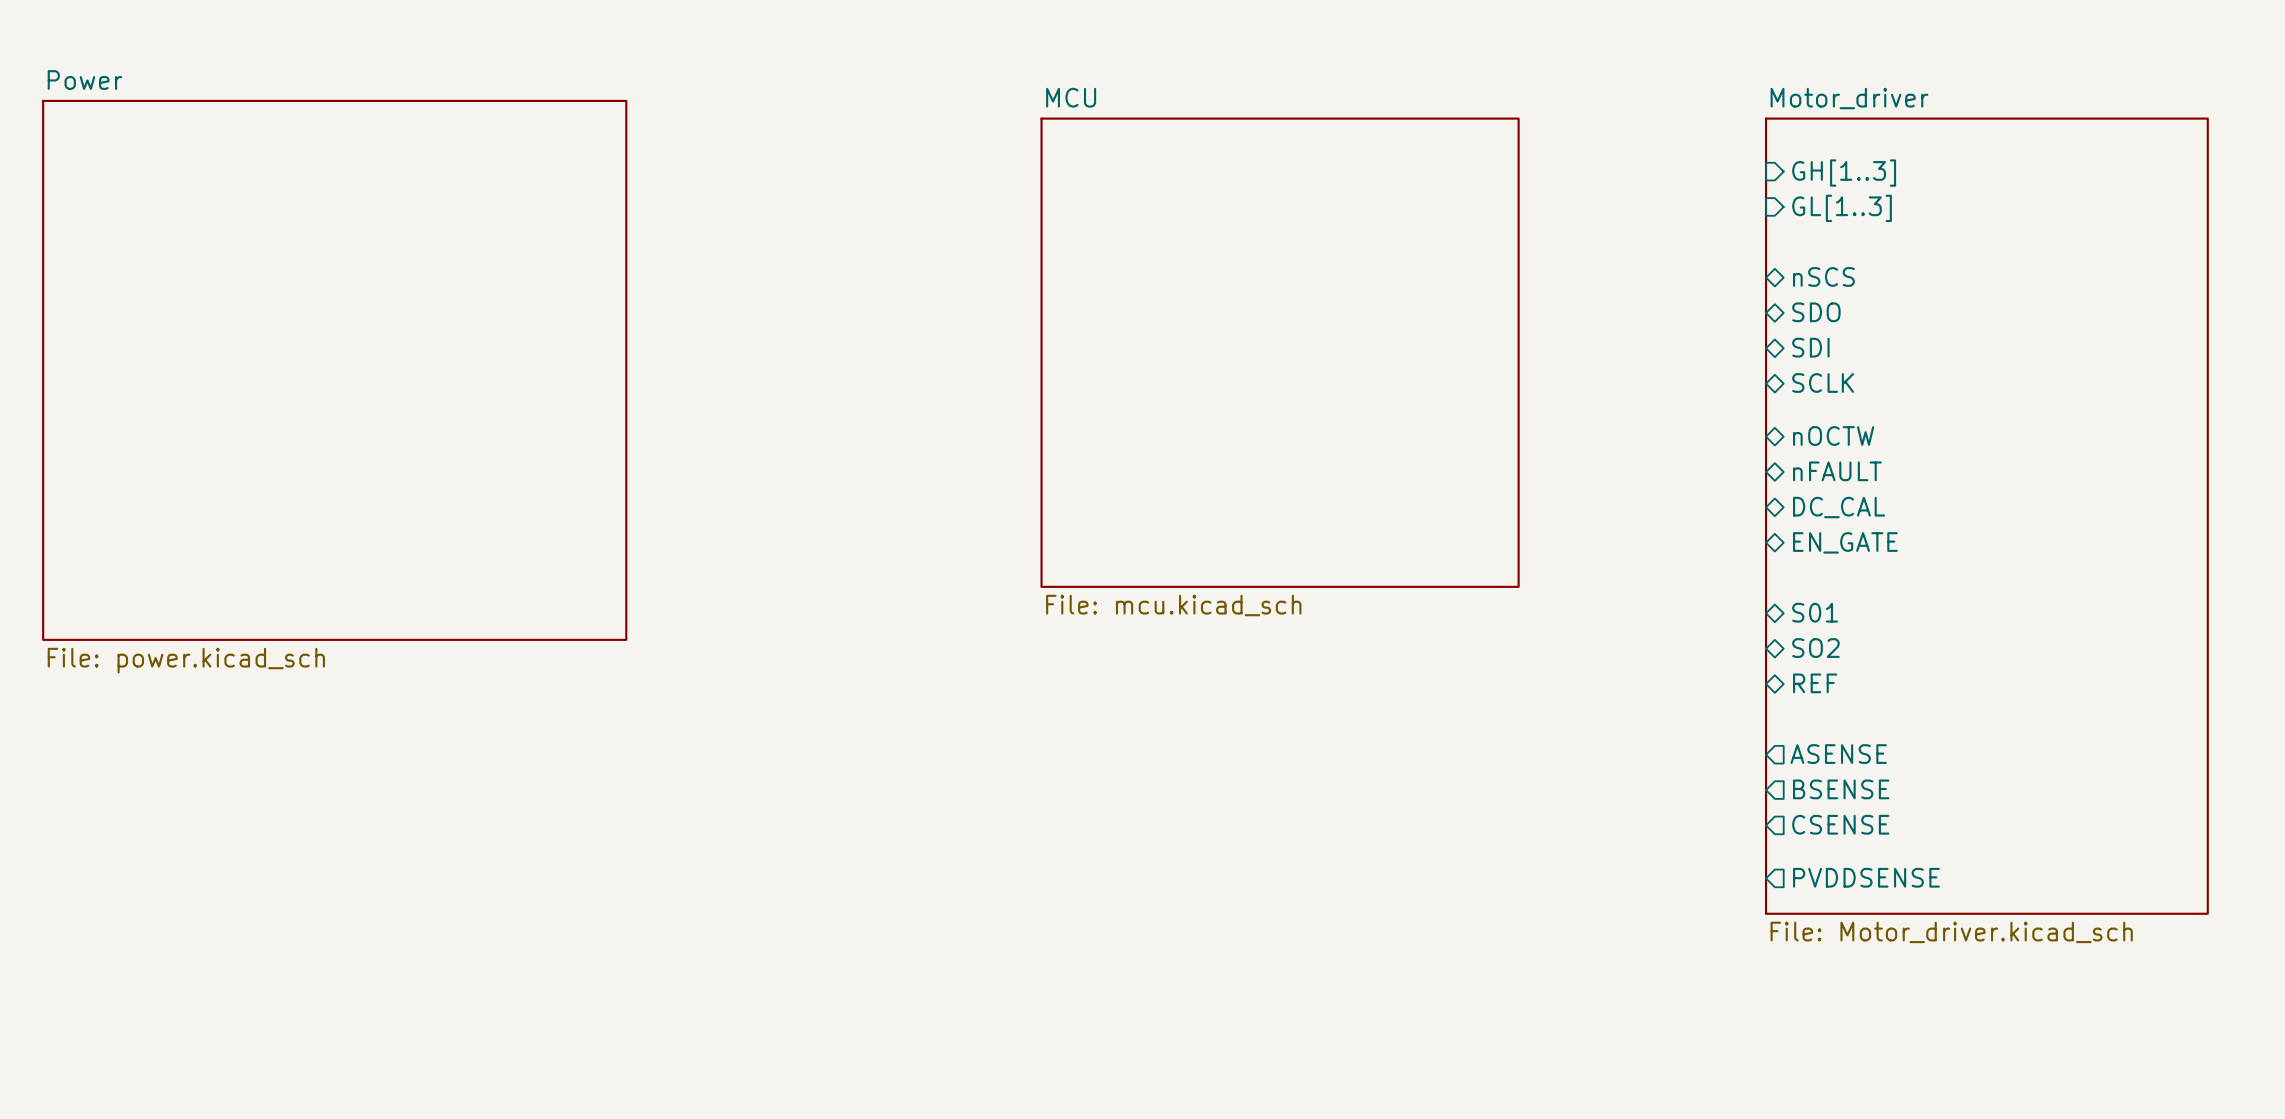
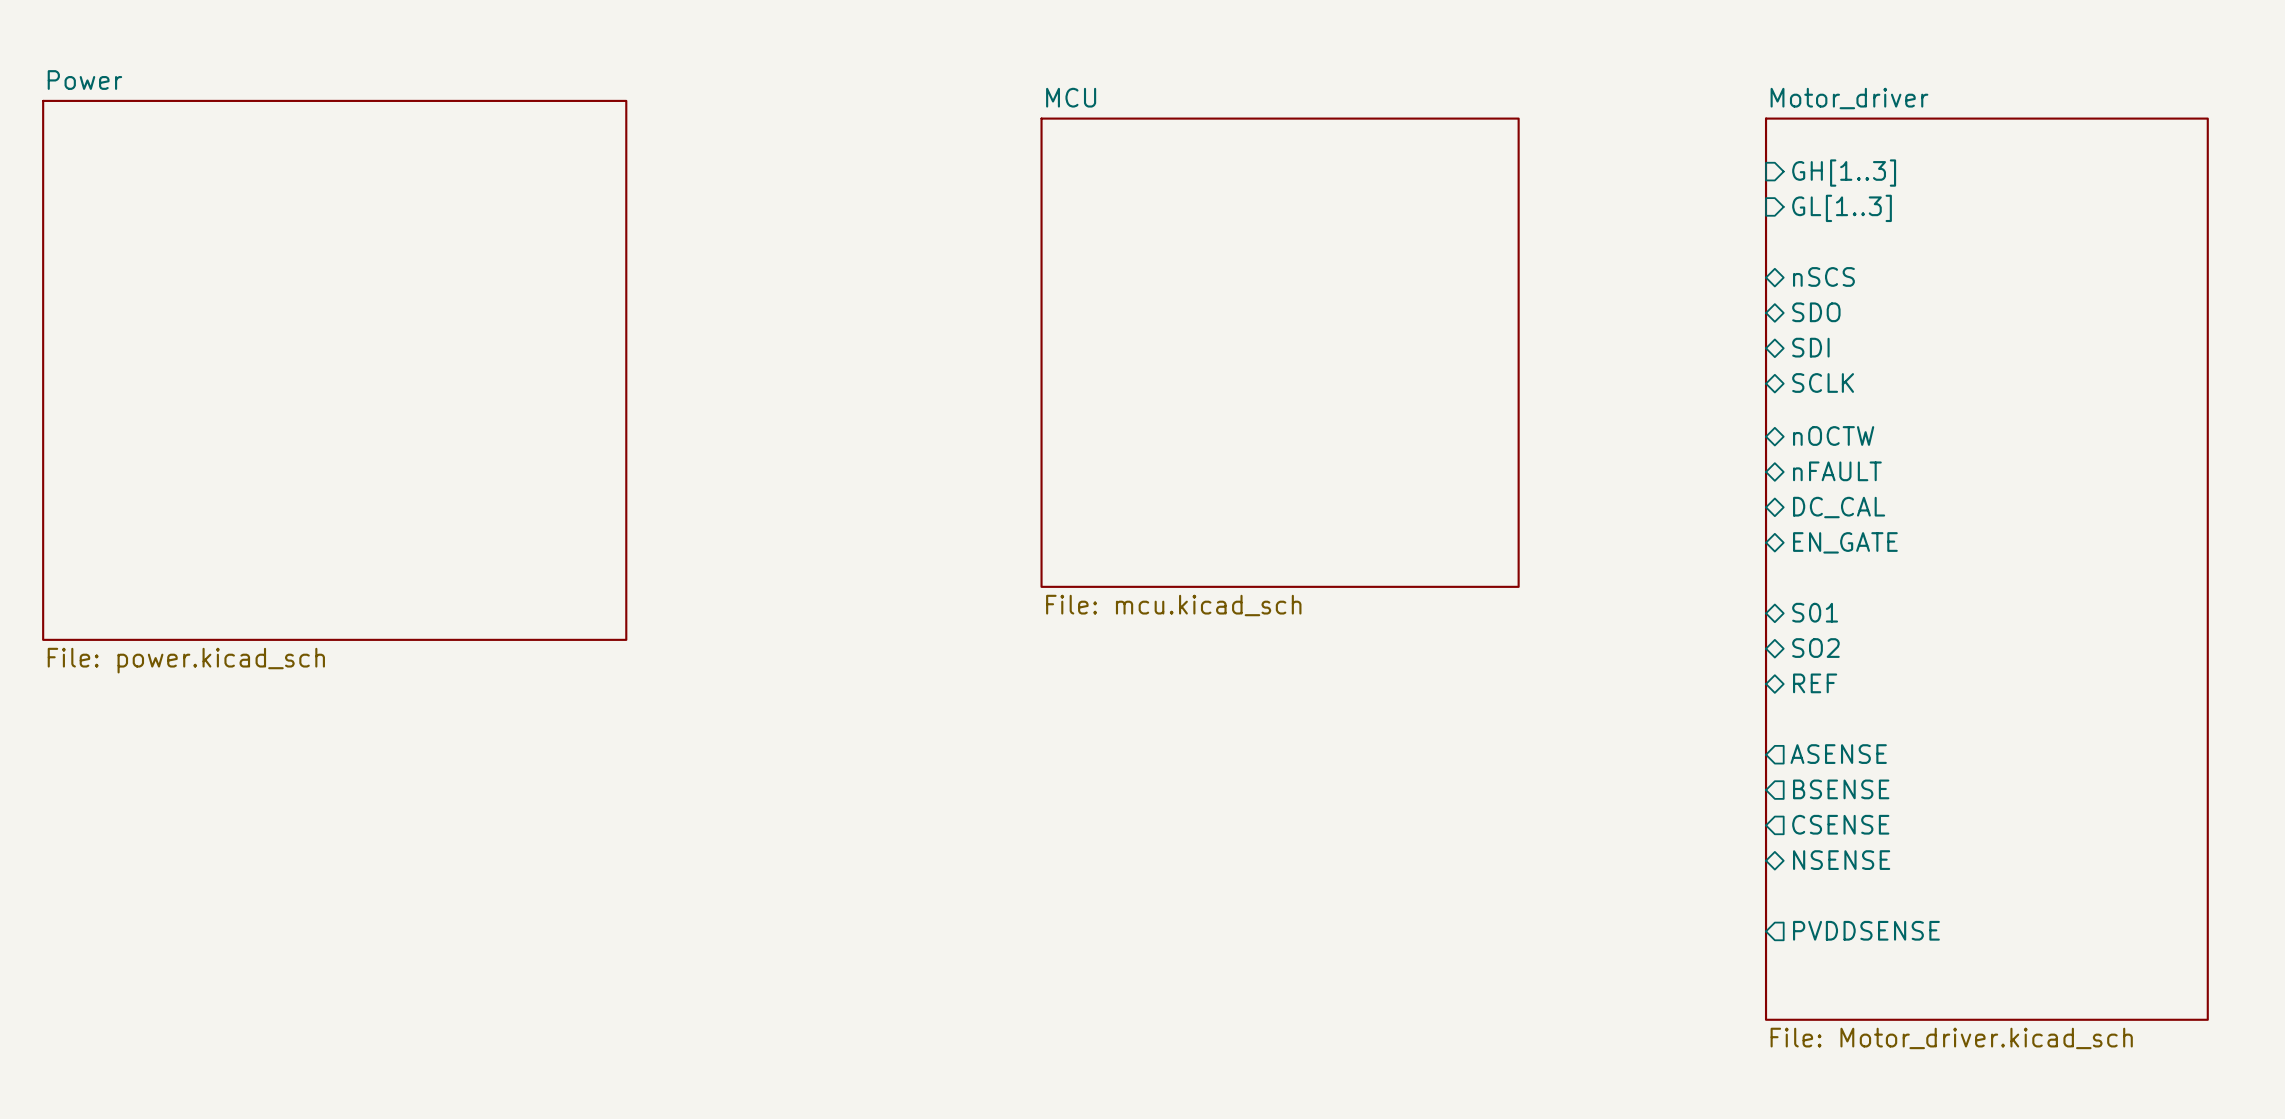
sheet Motor_driver: File: Motor_driver.kicad_sch (1986, 516) -> none
sheet Motor_driver: none -> File: Motor_driver.kicad_sch (1986, 569)
sheet pin: none -> NSENSE (1841, 860)
sheet pin position: PVDDSENSE (1866, 877) -> PVDDSENSE (1866, 930)

